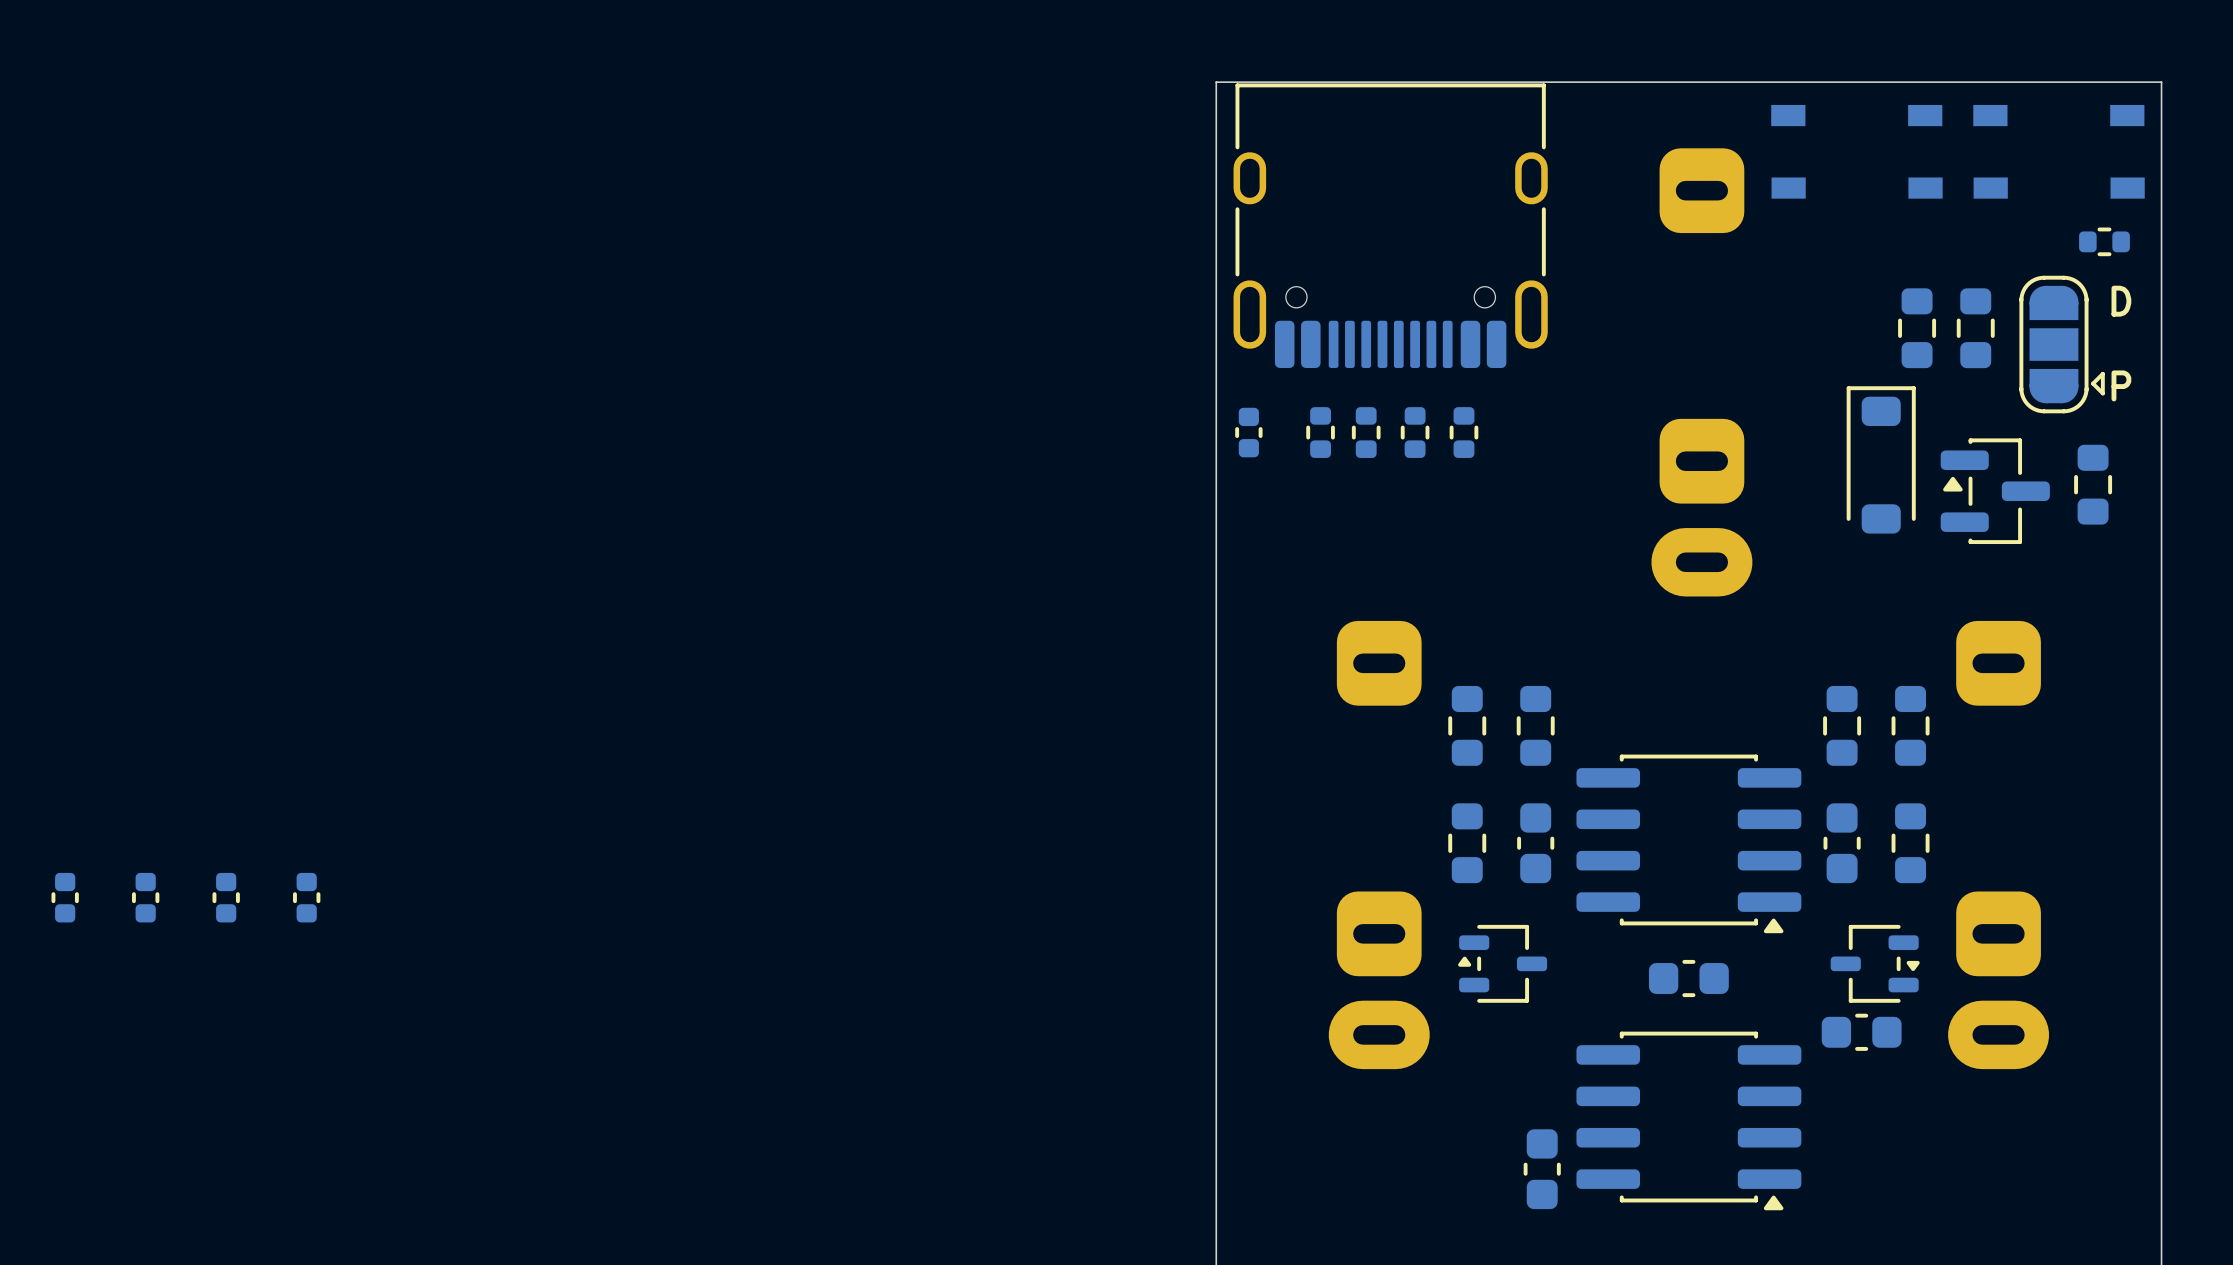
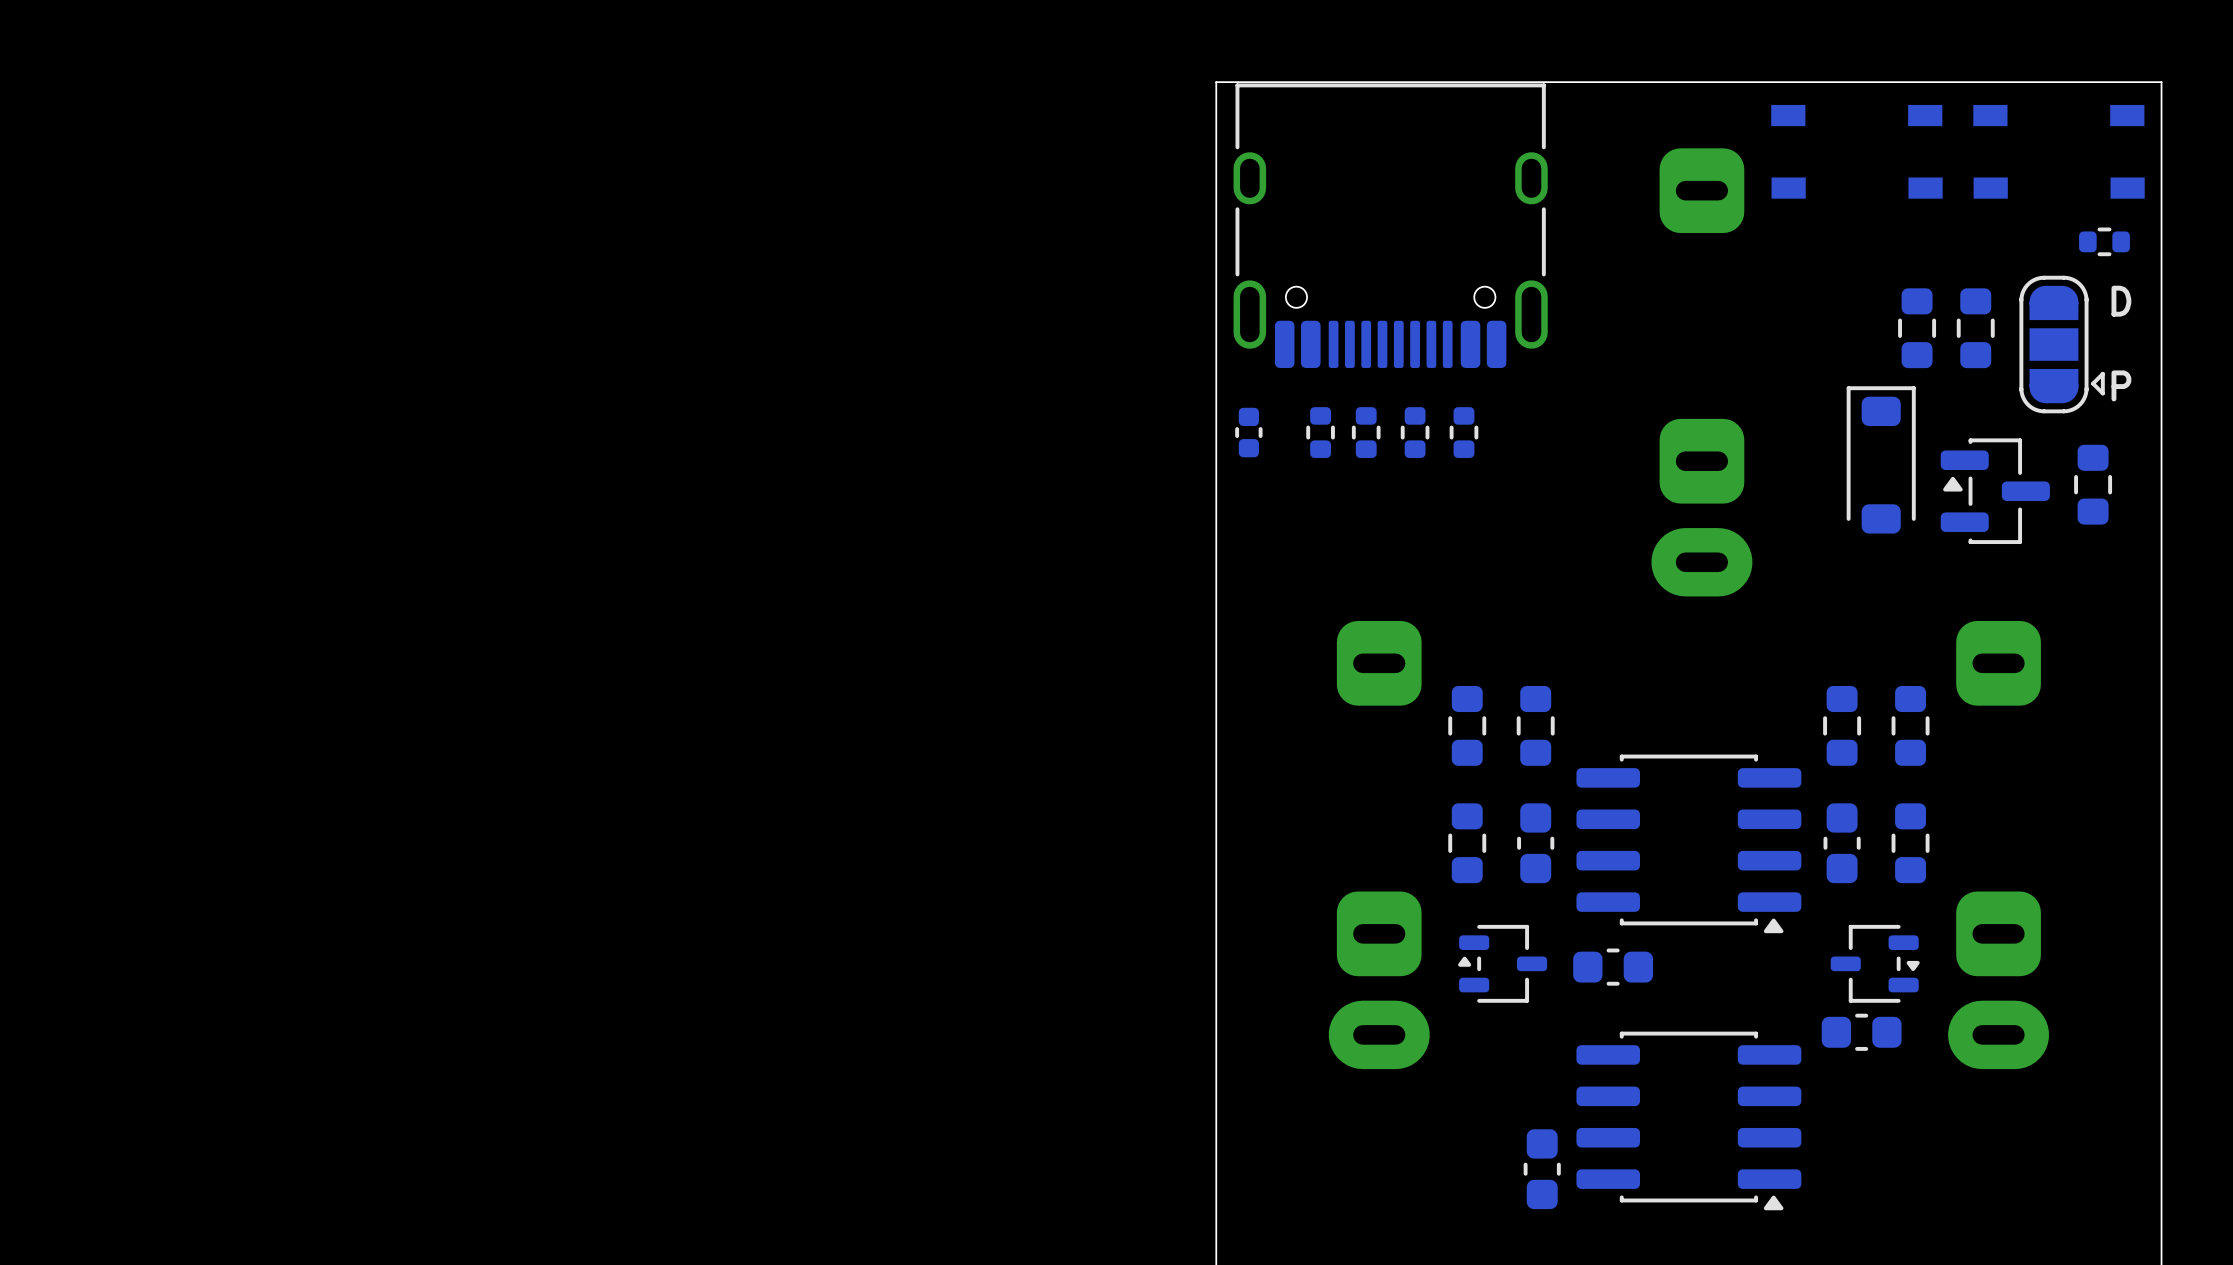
part: (65, 897) -> none
part: (145, 897) -> none
part: (226, 897) -> none
part: (306, 897) -> none
part position: (1688, 978) -> (1613, 967)

